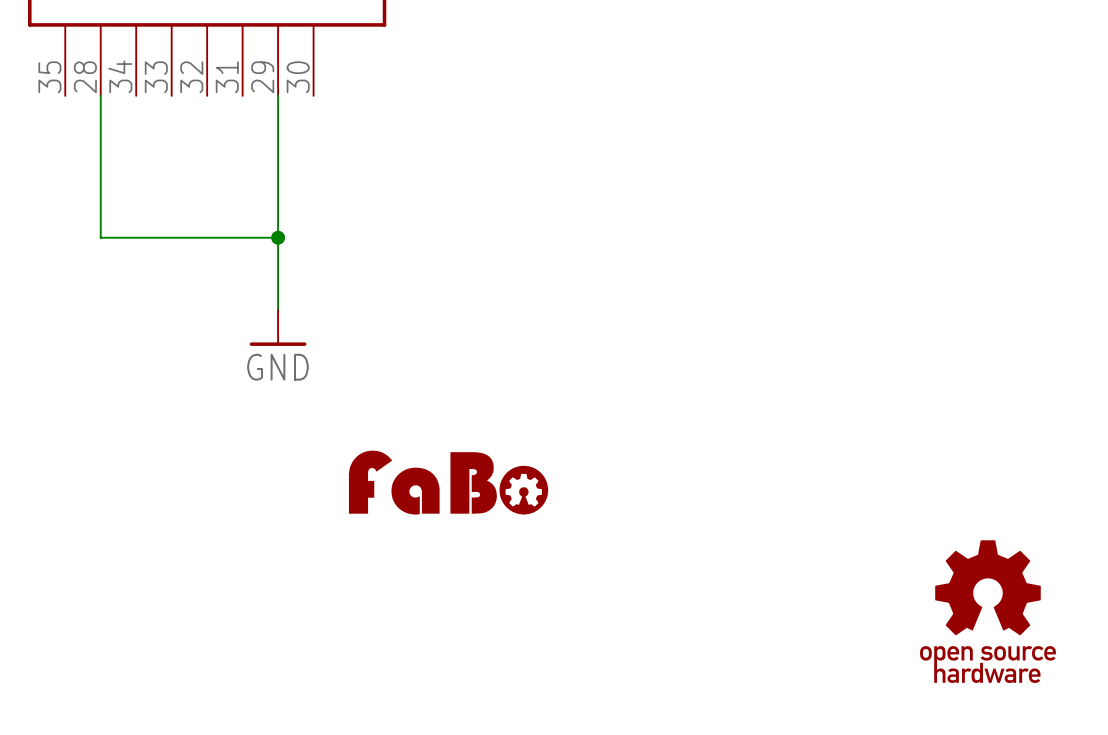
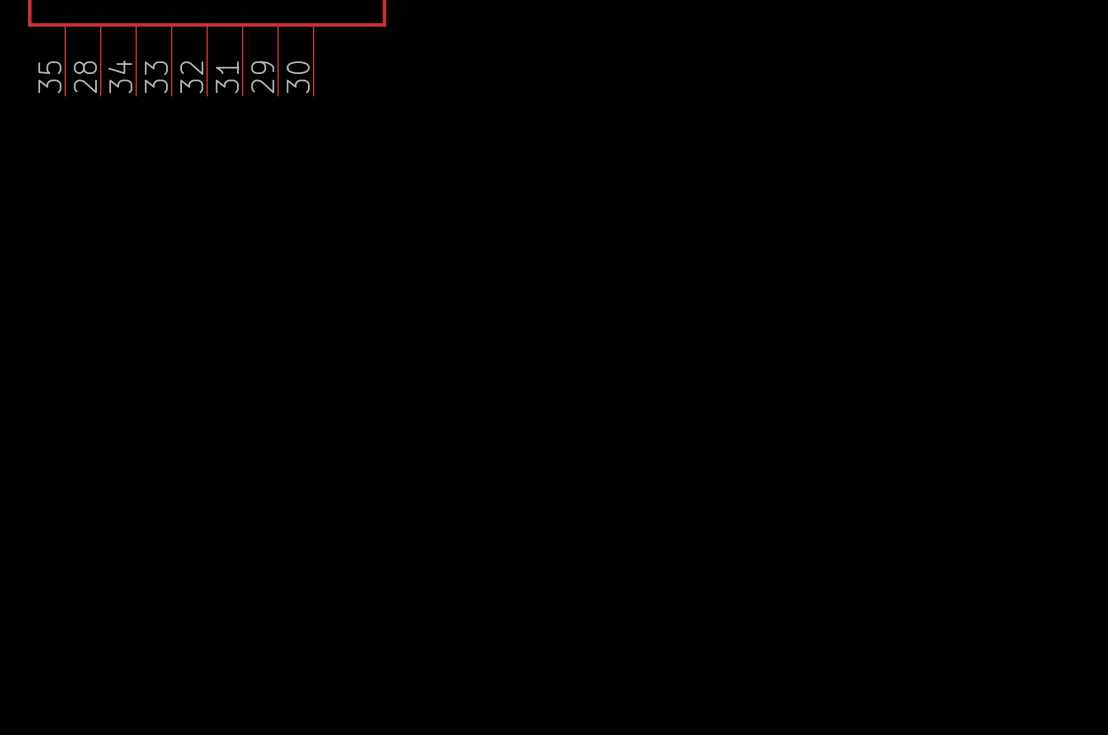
wire: (100, 95) (100, 237) (278, 237) -> none
wire: (278, 95) (278, 308) -> none
junction: (278, 237) -> none
power symbol: GND (278, 327) -> none
part: (448, 482) -> none
part: (987, 611) -> none

